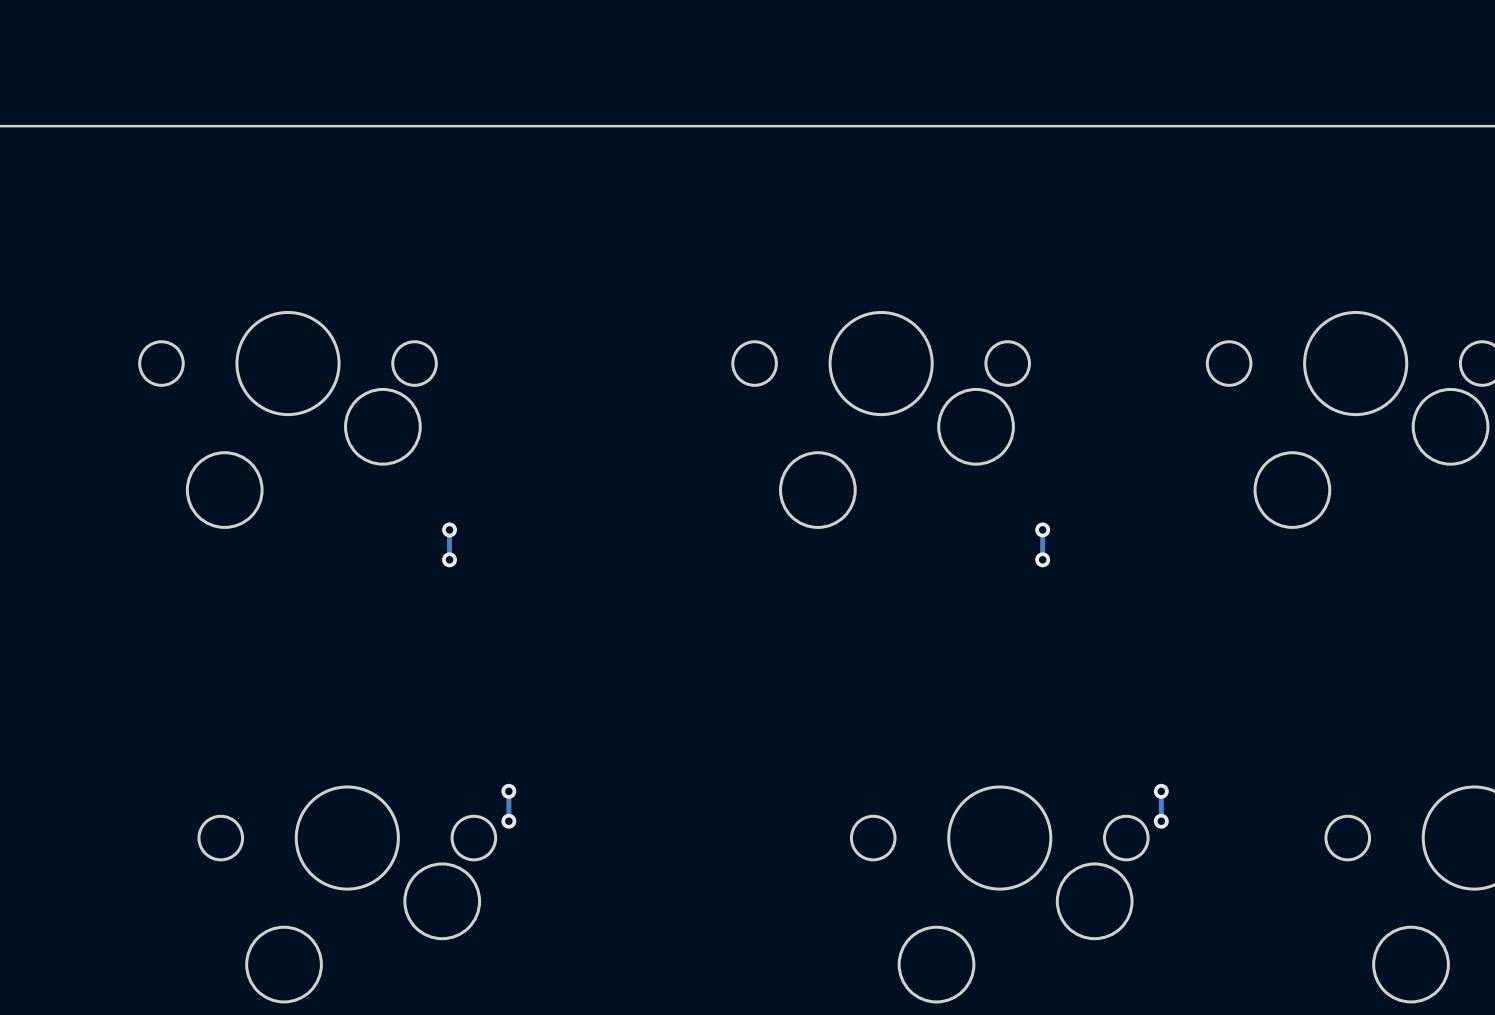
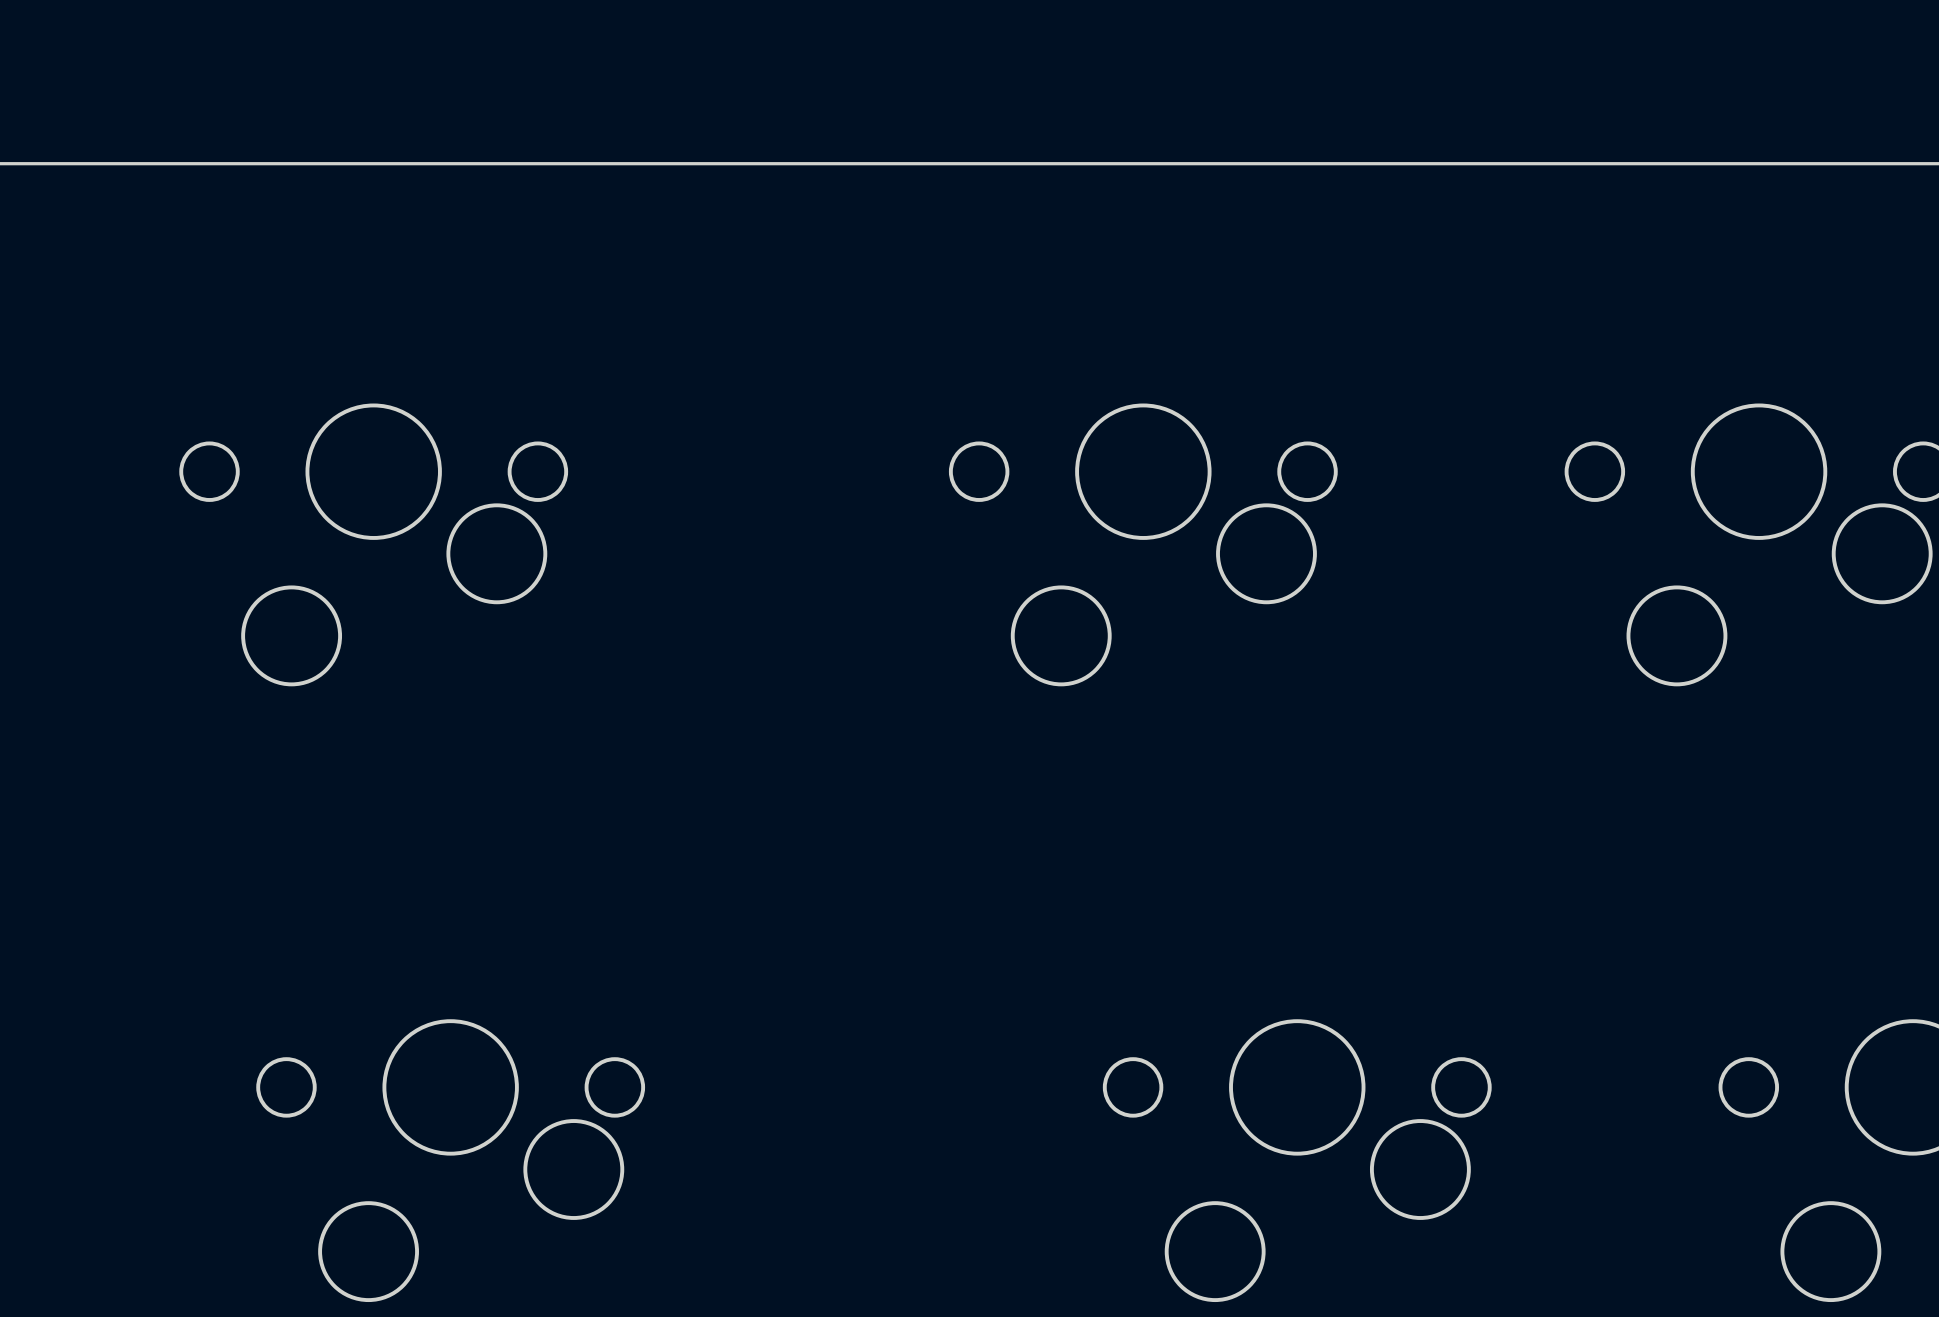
track: (449, 529) (449, 559) -> none
via: (449, 529) -> none
track: (1042, 529) (1042, 559) -> none
via: (1042, 529) -> none
via: (449, 559) -> none
via: (1042, 559) -> none
track: (508, 791) (508, 821) -> none
via: (508, 791) -> none
track: (1161, 791) (1161, 821) -> none
via: (1161, 791) -> none
via: (508, 821) -> none
via: (1161, 821) -> none

